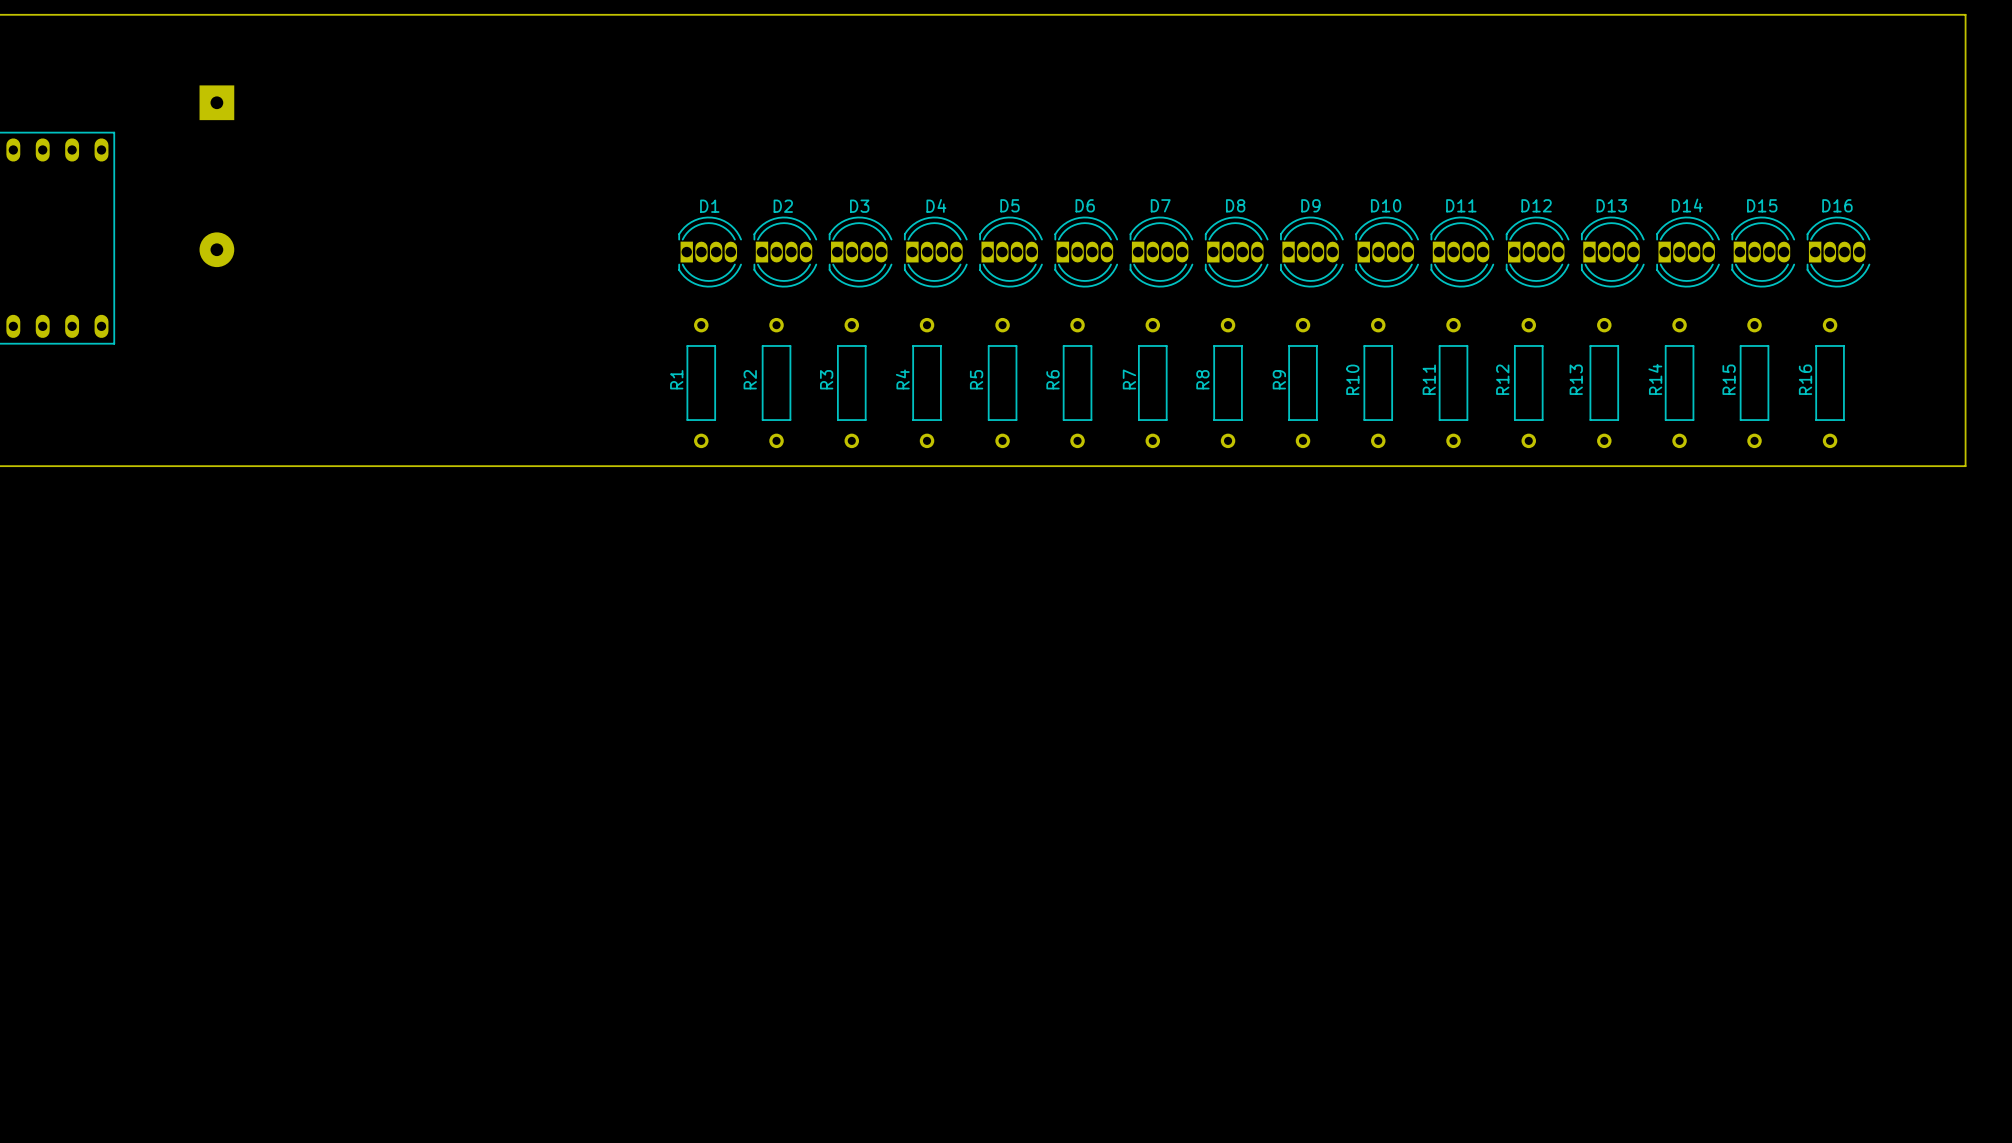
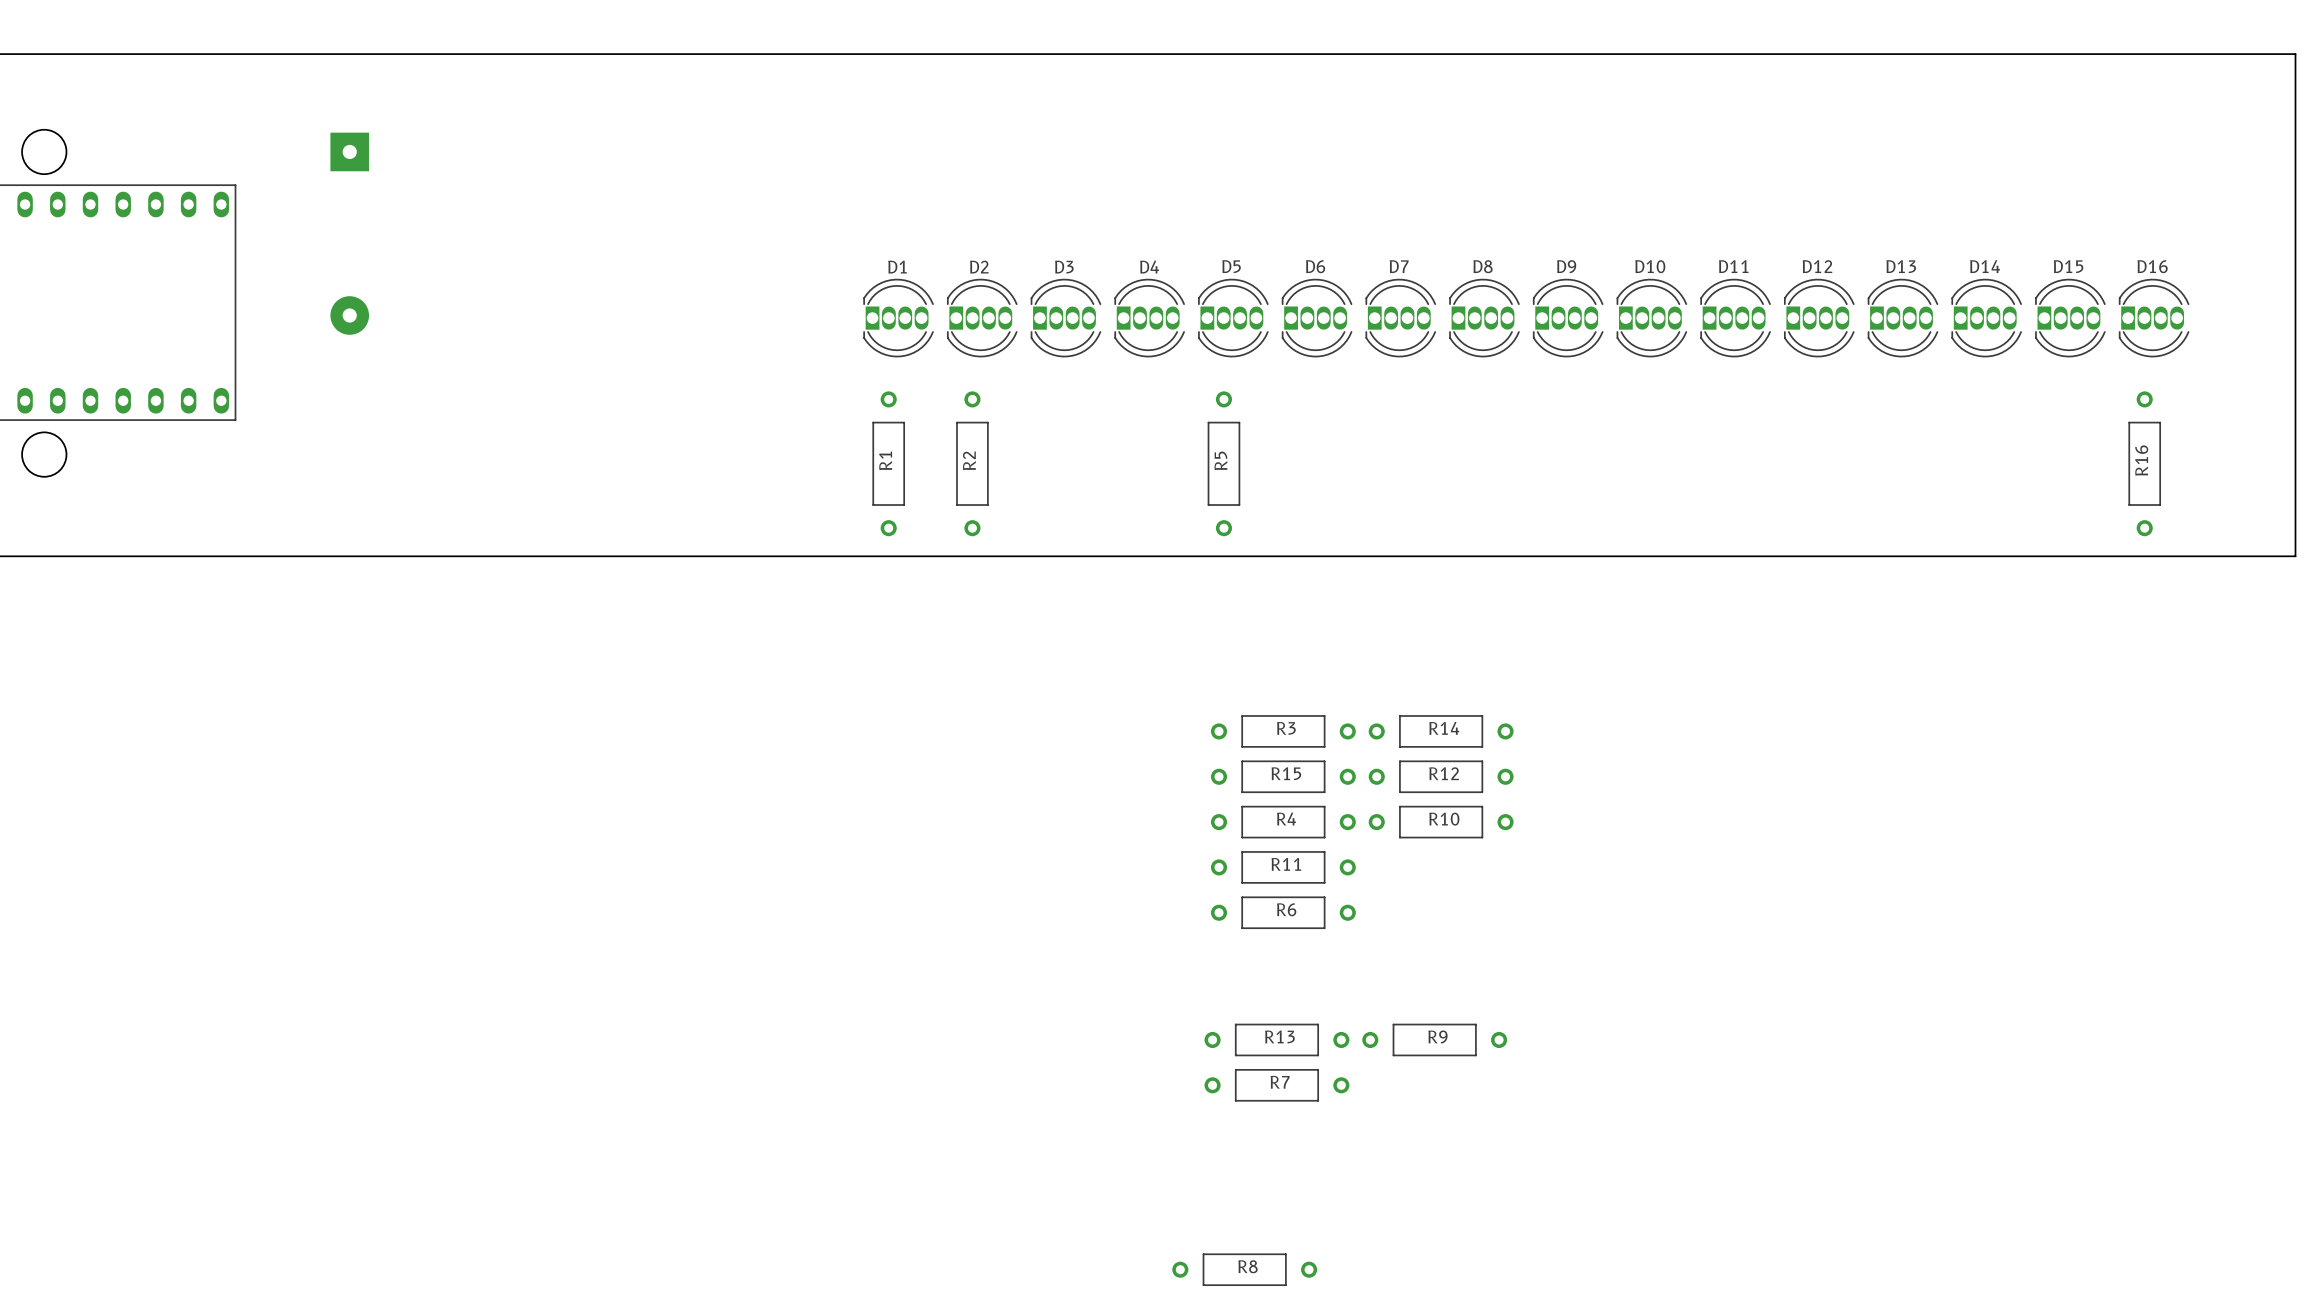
R1 name position: R1 (676, 379) -> R1 (885, 460)
R2 name position: R2 (750, 379) -> R2 (969, 460)
R5 name position: R5 (976, 379) -> R5 (1220, 460)
R12 name position: R12 (1502, 379) -> R12 (1444, 773)
R13 name position: R13 (1576, 379) -> R13 (1279, 1036)
R16 name position: R16 (1805, 379) -> R16 (2141, 460)
R3 rotation: 0° (851, 383) -> 90° clockwise (1283, 731)
R3 position: (851, 383) -> (1283, 731)
R4 rotation: 0° (927, 383) -> 90° clockwise (1283, 822)
R4 position: (927, 383) -> (1283, 822)
R6 rotation: 0° (1077, 383) -> 90° clockwise (1283, 912)
R6 position: (1077, 383) -> (1283, 912)
R7 rotation: 0° (1152, 383) -> 90° clockwise (1276, 1085)
R7 position: (1152, 383) -> (1276, 1085)
R8 rotation: 0° (1228, 383) -> 90° clockwise (1244, 1269)
R8 position: (1228, 383) -> (1244, 1269)
R9 rotation: 0° (1303, 383) -> 90° clockwise (1434, 1039)
R9 position: (1303, 383) -> (1434, 1039)
R10 rotation: 0° (1378, 383) -> 90° clockwise (1441, 822)
R10 position: (1378, 383) -> (1441, 822)
R11 rotation: 0° (1453, 383) -> 90° clockwise (1283, 867)
R11 position: (1453, 383) -> (1283, 867)
R12 rotation: 0° (1528, 383) -> 90° clockwise (1441, 776)
R12 position: (1528, 383) -> (1441, 776)
R13 rotation: 0° (1604, 383) -> 90° clockwise (1276, 1039)
R13 position: (1604, 383) -> (1276, 1039)
R14 rotation: 0° (1679, 383) -> 90° clockwise (1441, 731)
R14 position: (1679, 383) -> (1441, 731)
R15 rotation: 0° (1754, 383) -> 90° clockwise (1283, 776)
R15 position: (1754, 383) -> (1283, 776)

